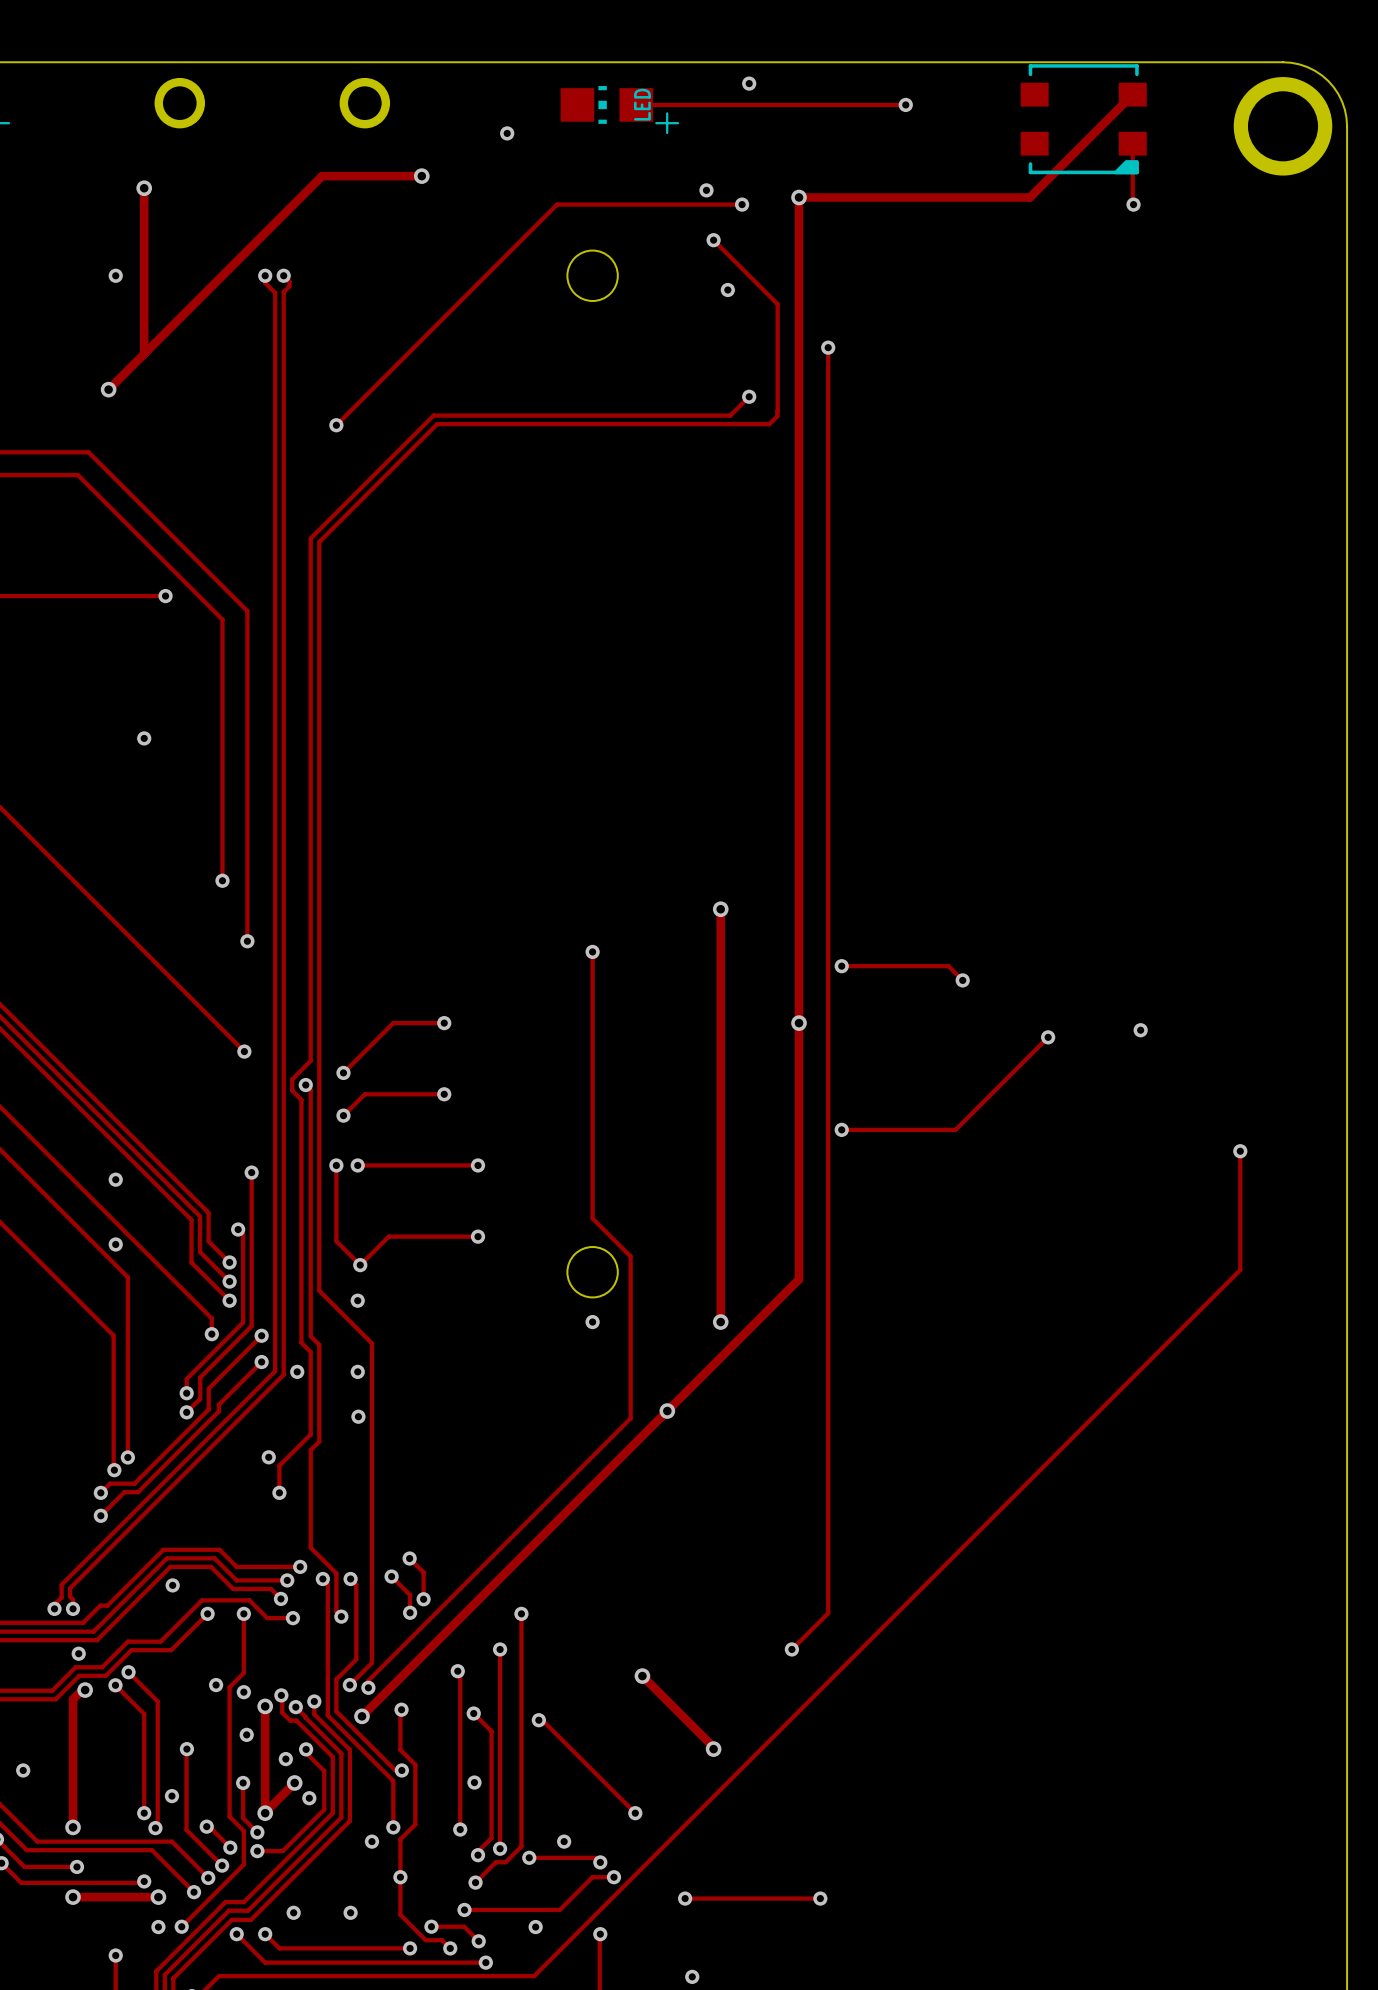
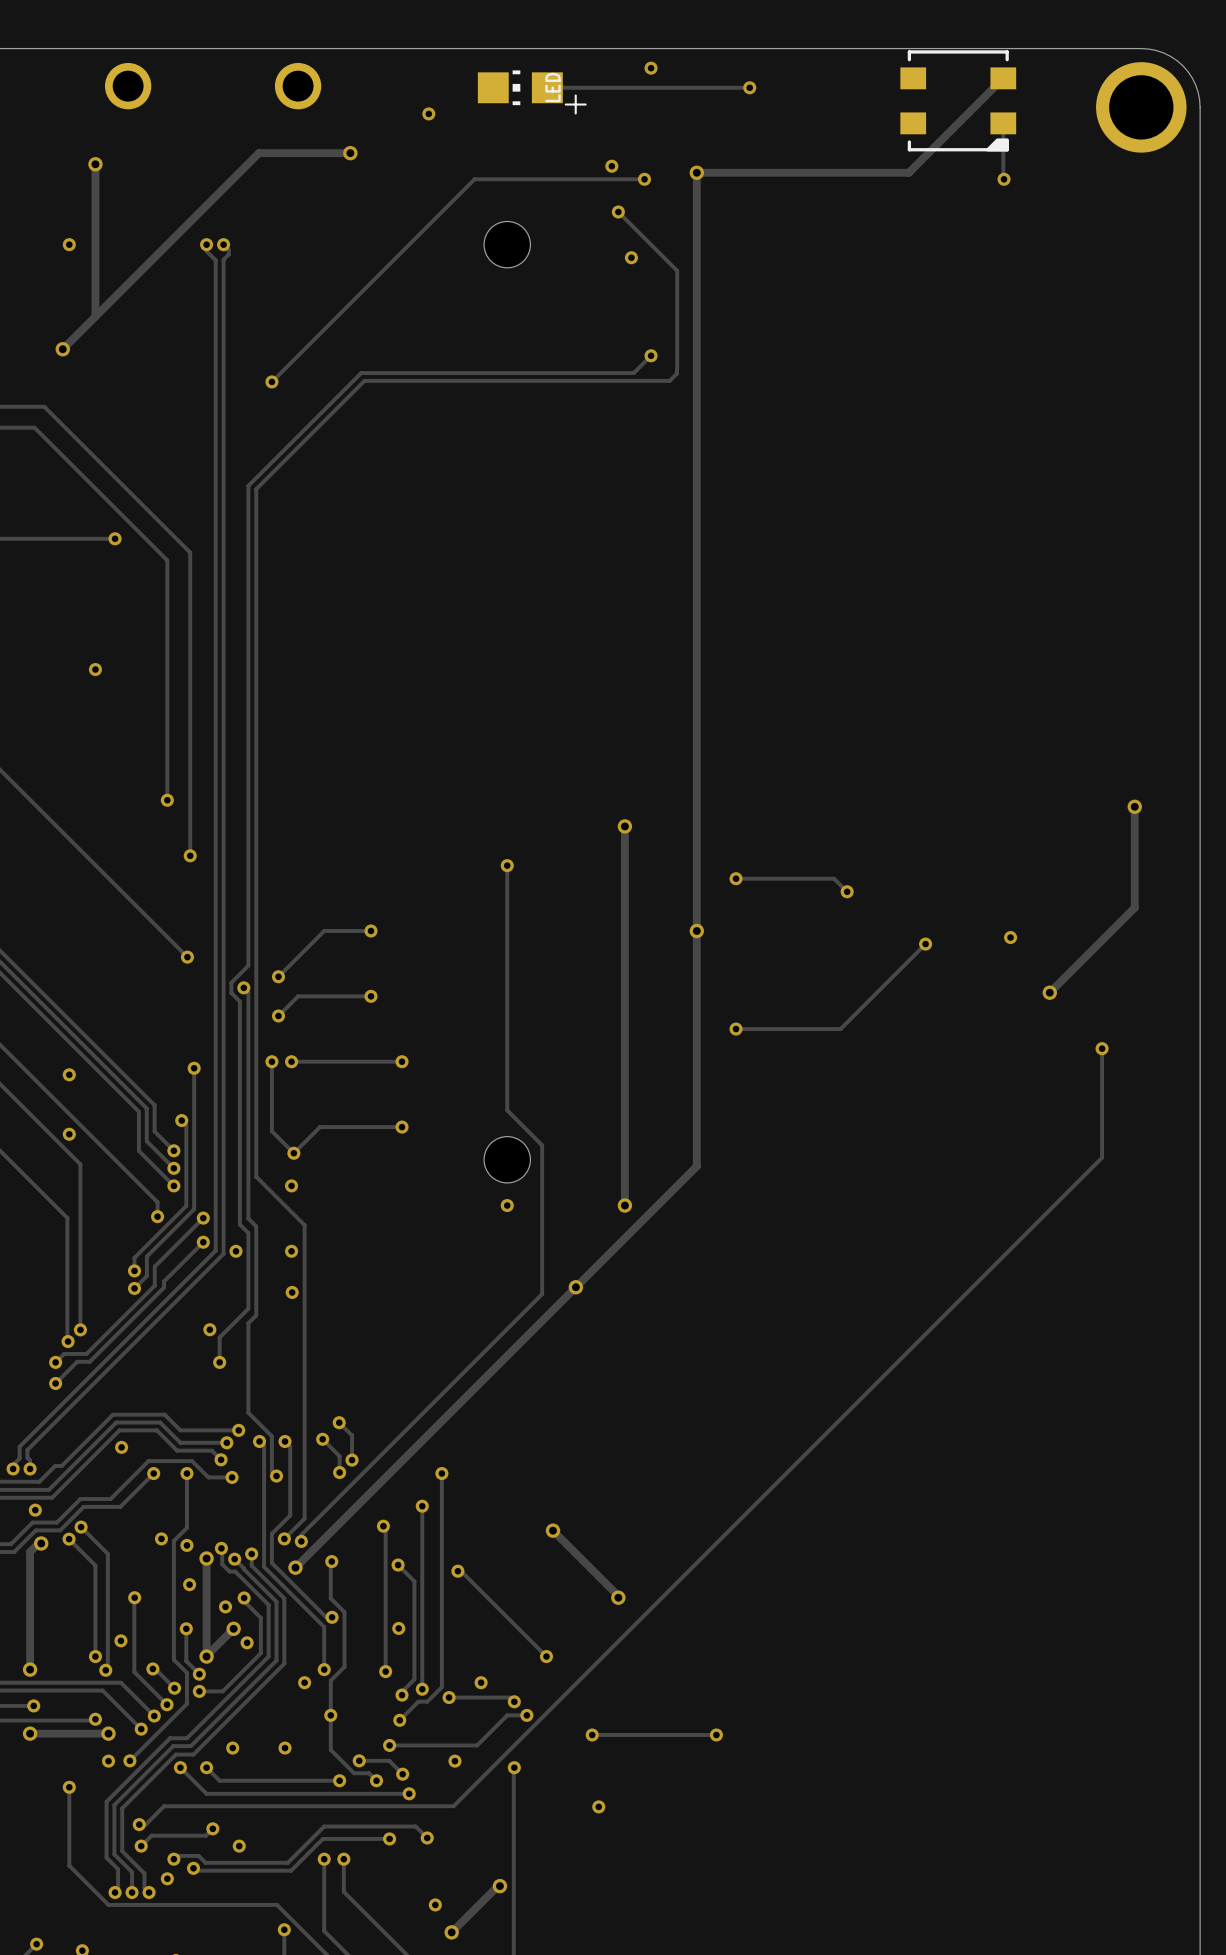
track: (856, 104) (905, 104) -> none
via position: (905, 104) -> (749, 87)
track: (828, 347) (828, 1613) (791, 1649) -> none
via: (828, 347) -> none
track: none -> (1134, 806) (1134, 907) (1049, 992)
via: none -> (1134, 806)
via: none -> (1049, 992)
via: (791, 1649) -> none

